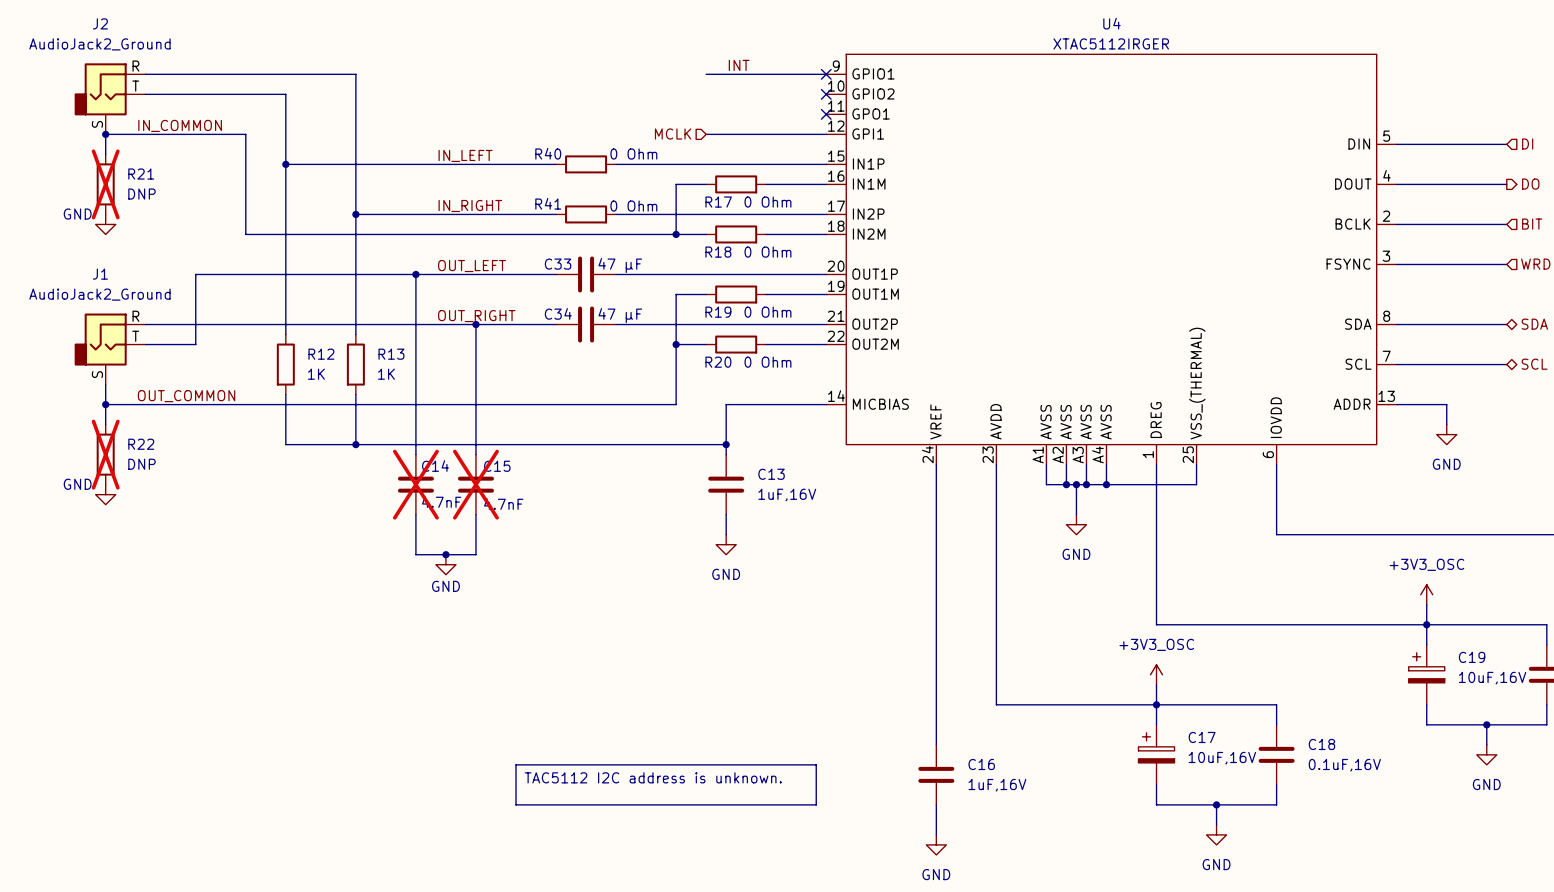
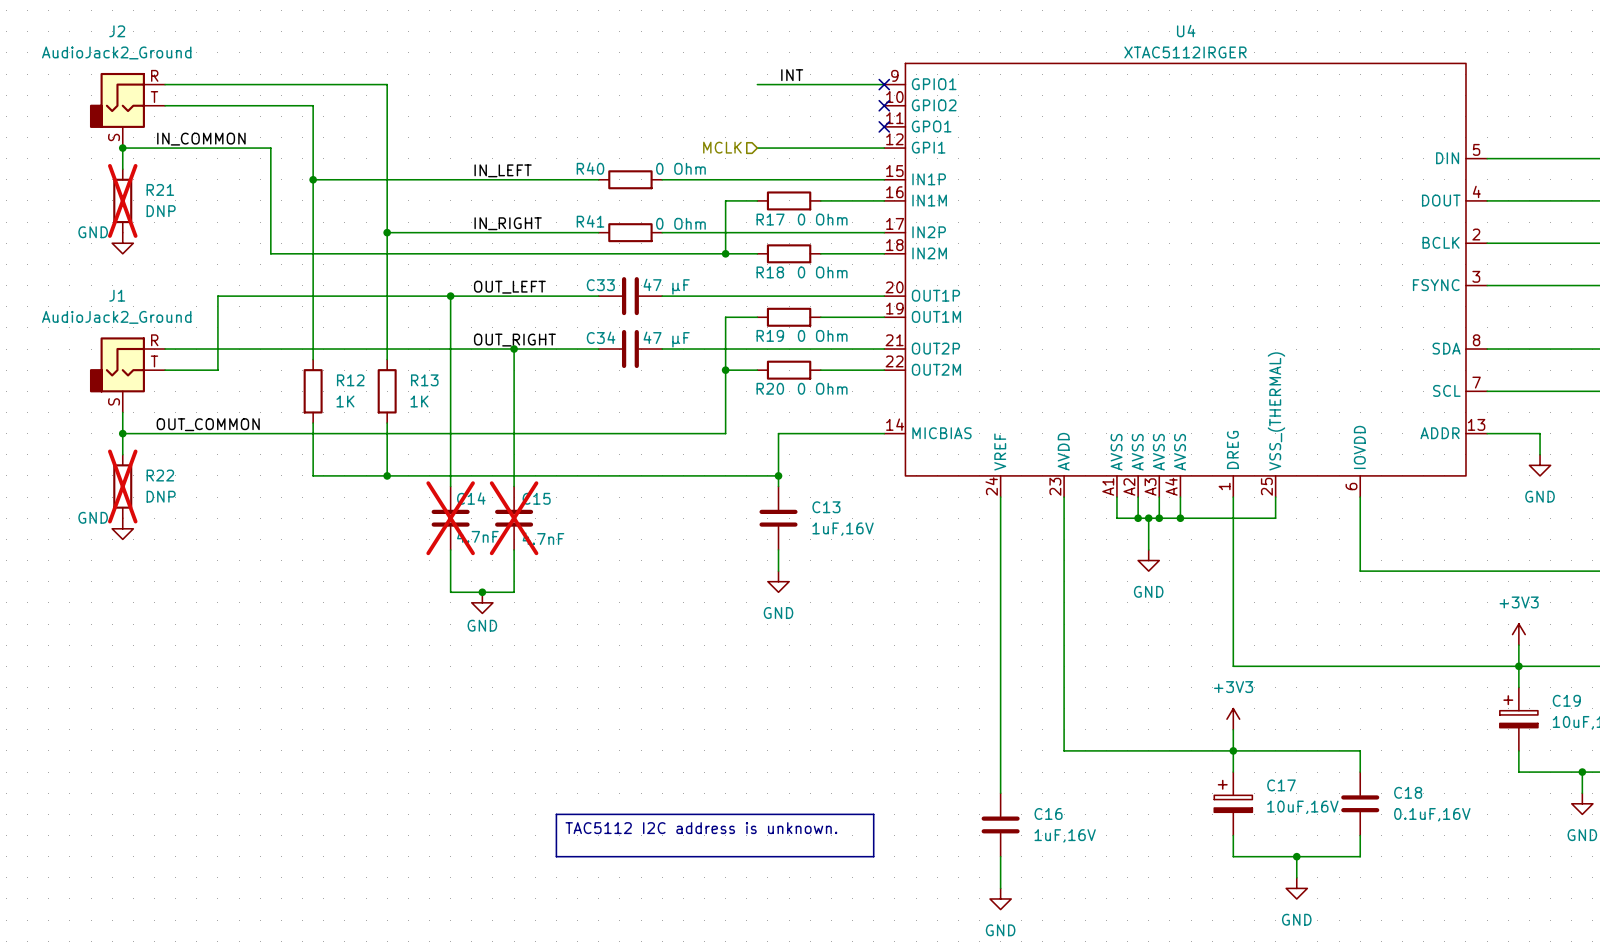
power symbol: +3V3_OSC (1426, 594) -> +3V3 (1518, 634)
power symbol: +3V3_OSC (1156, 674) -> +3V3 (1233, 719)

